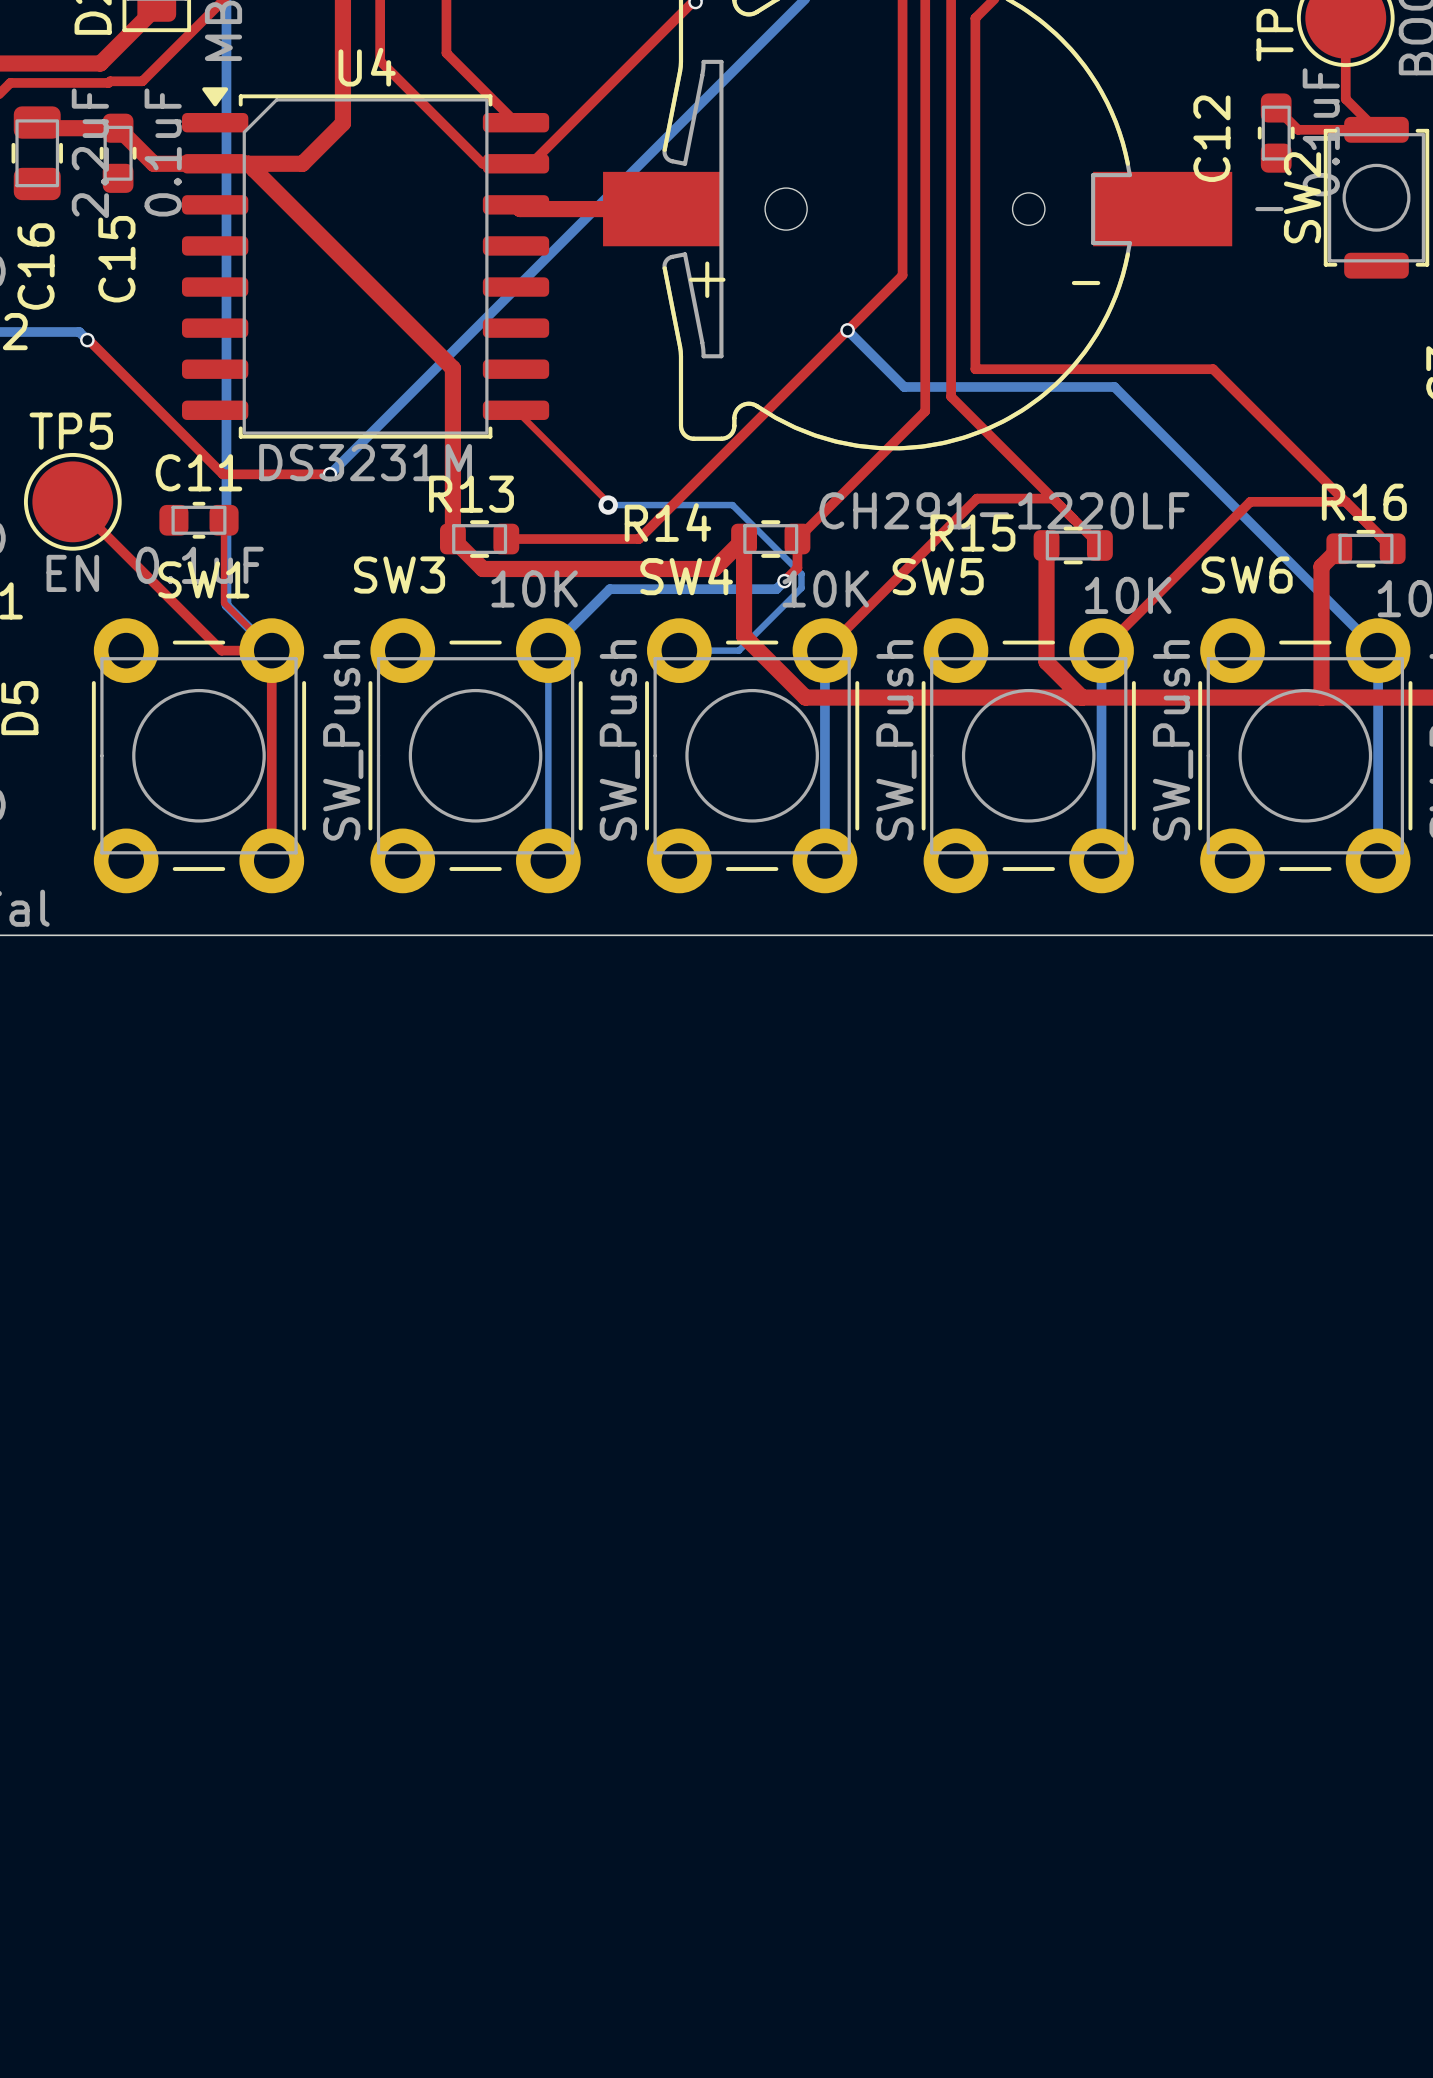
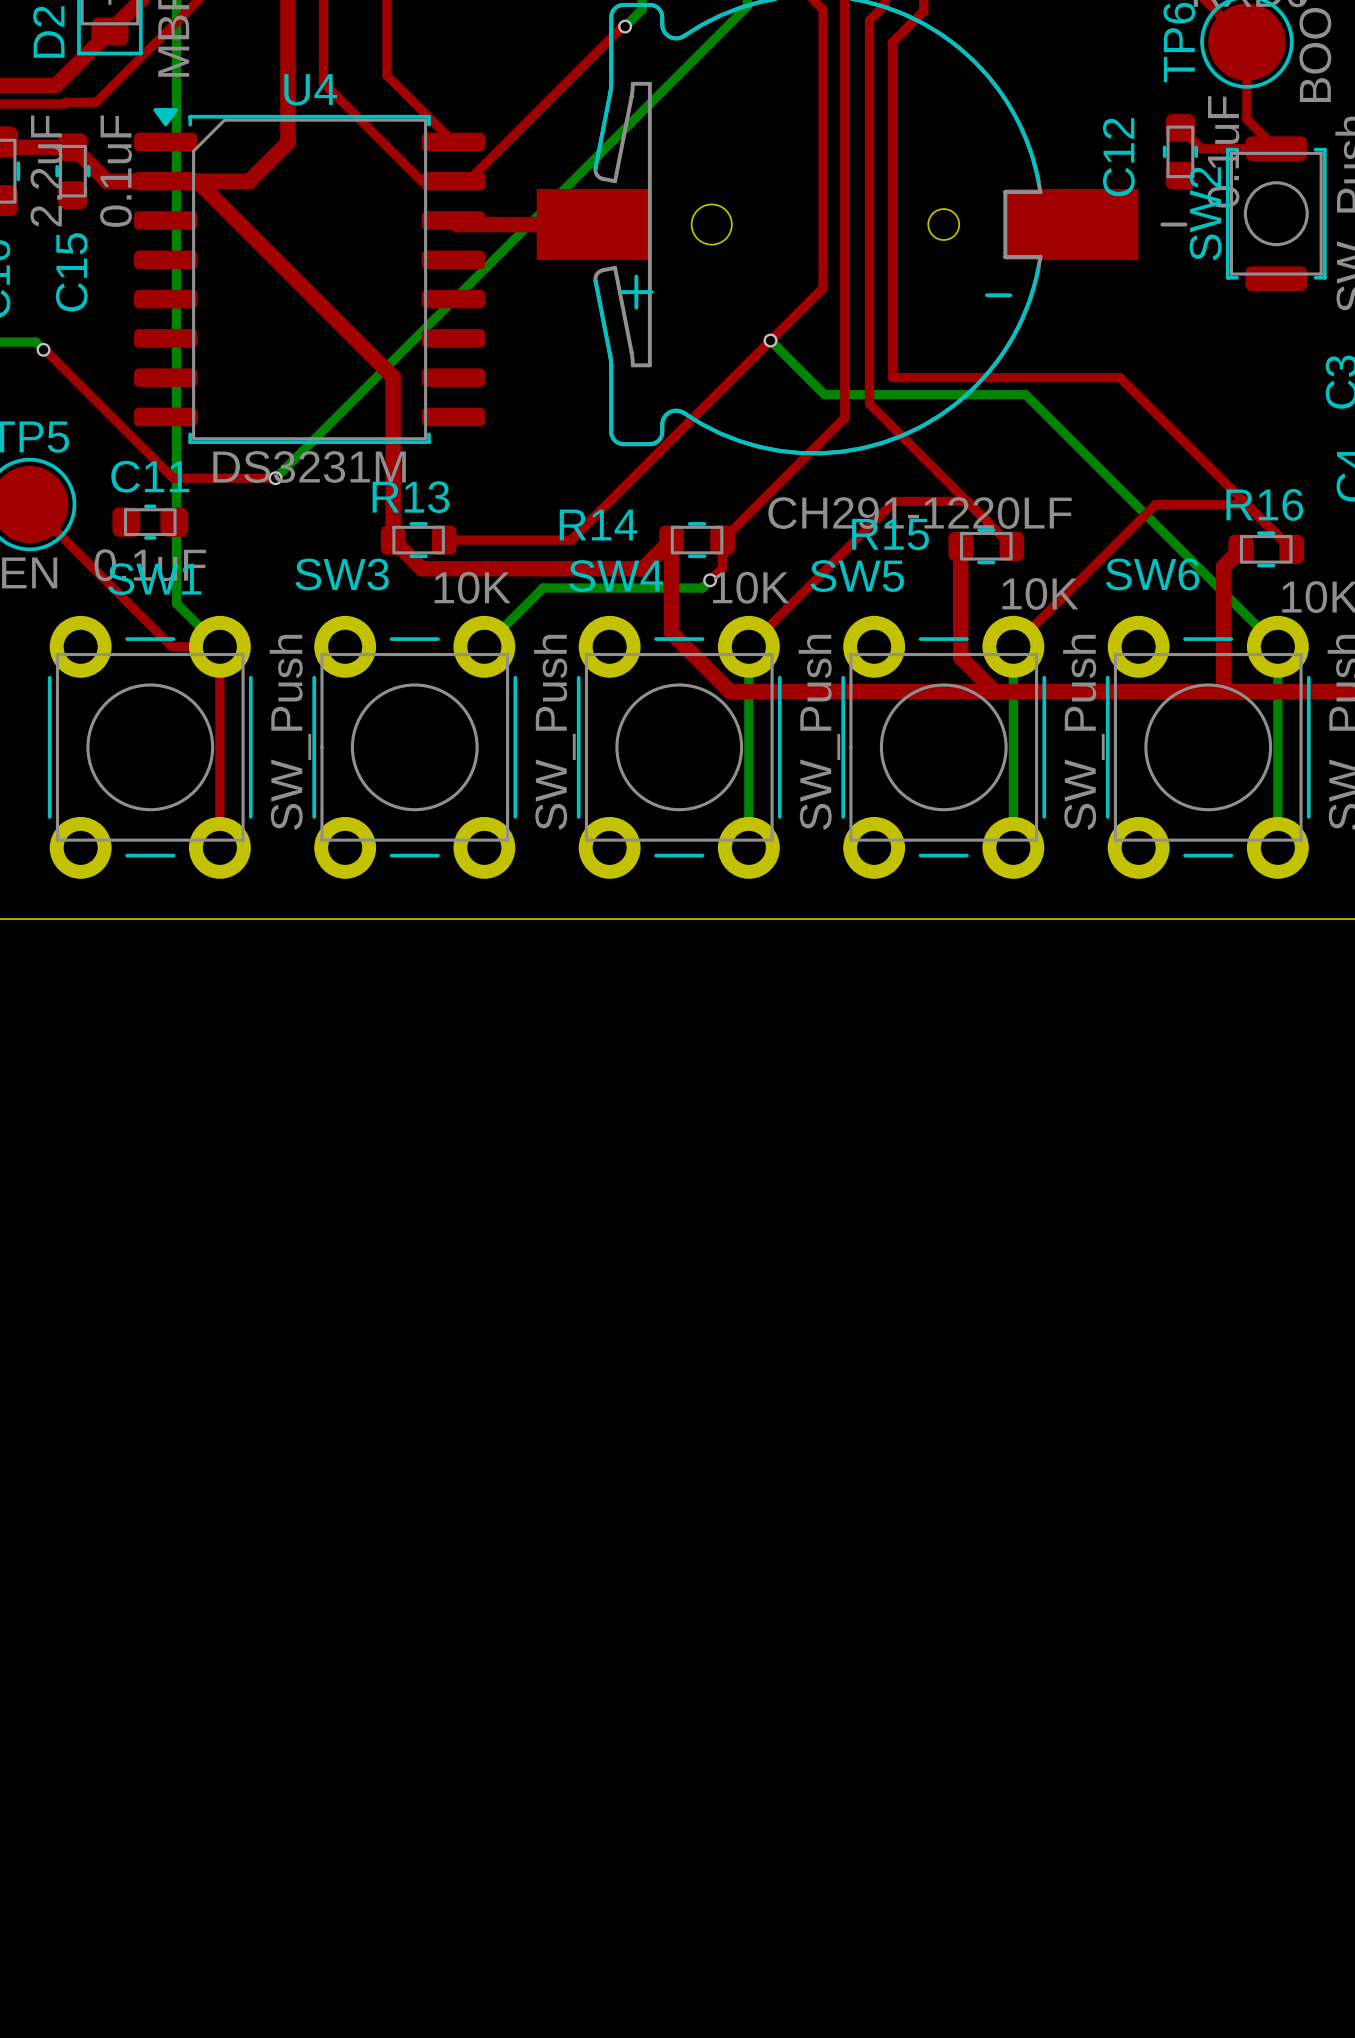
top track: (516, 410) (608, 502) (608, 508) -> none
bottom track: (608, 505) (732, 505) (801, 574) (801, 588) (738, 650) (679, 650) -> none
via: (608, 505) -> none
top track: (224, 520) (224, 602) (271, 650) -> none
bottom track: (548, 650) (548, 860) -> none

